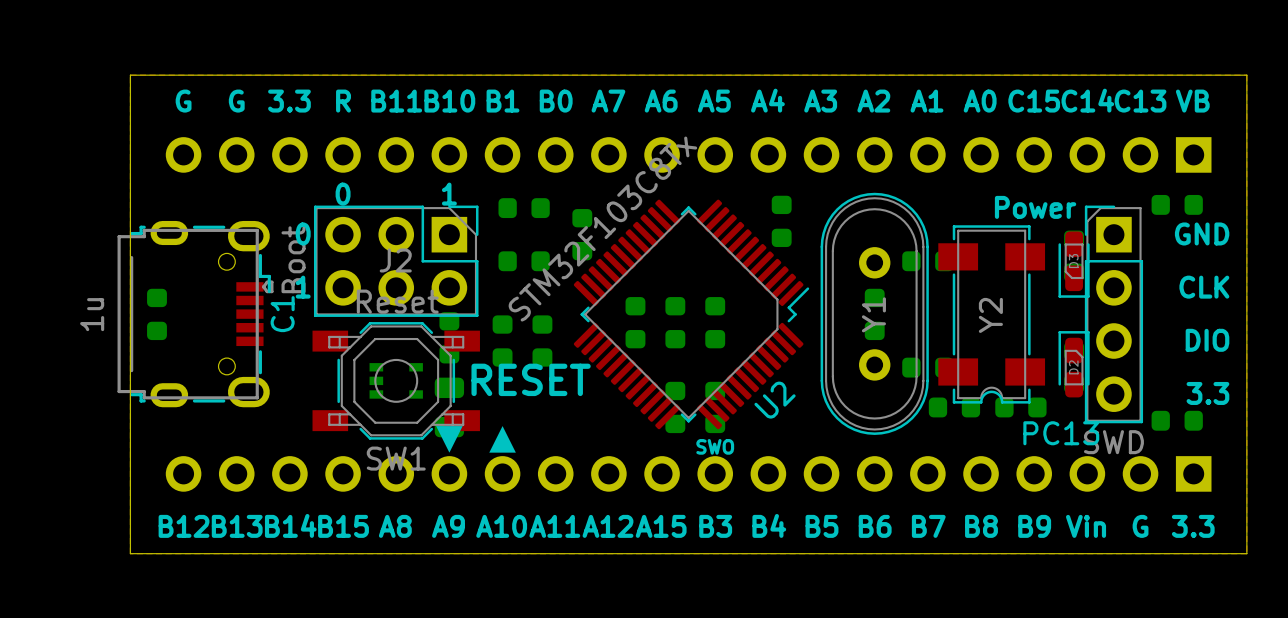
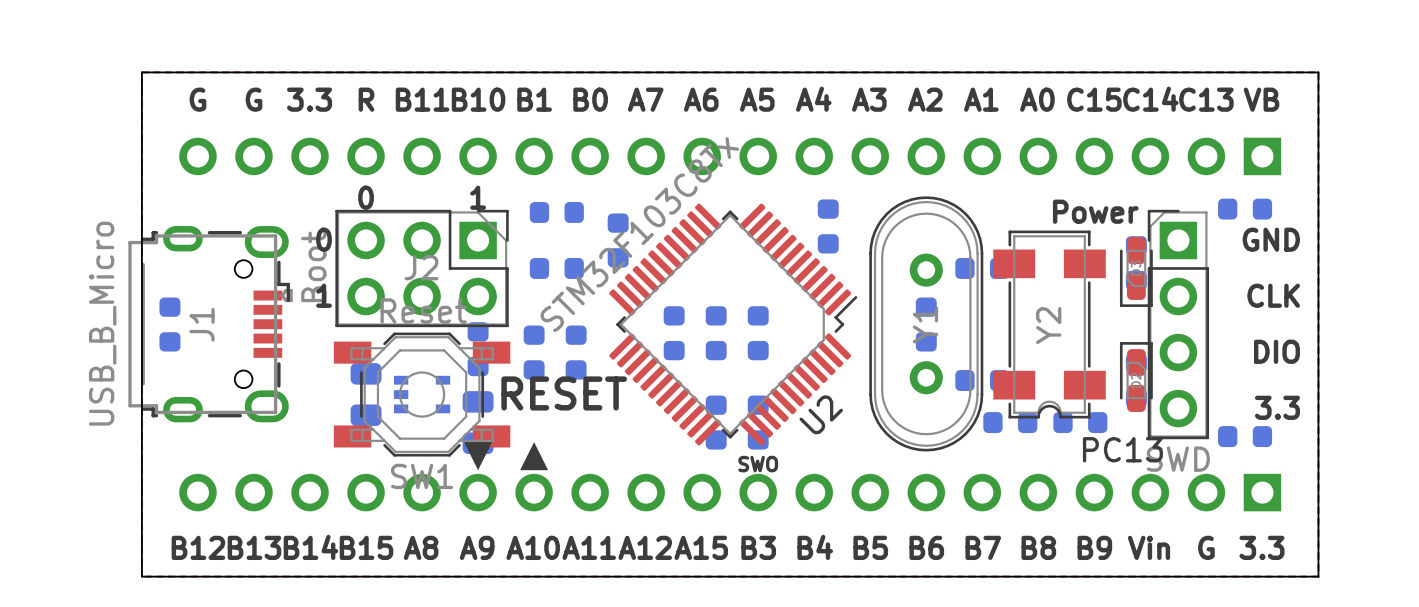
C1 value: 1u (92, 314) -> USB_B_Micro (102, 323)
C1 name: C1 (282, 314) -> J1 (201, 324)
part: none -> (366, 394)

